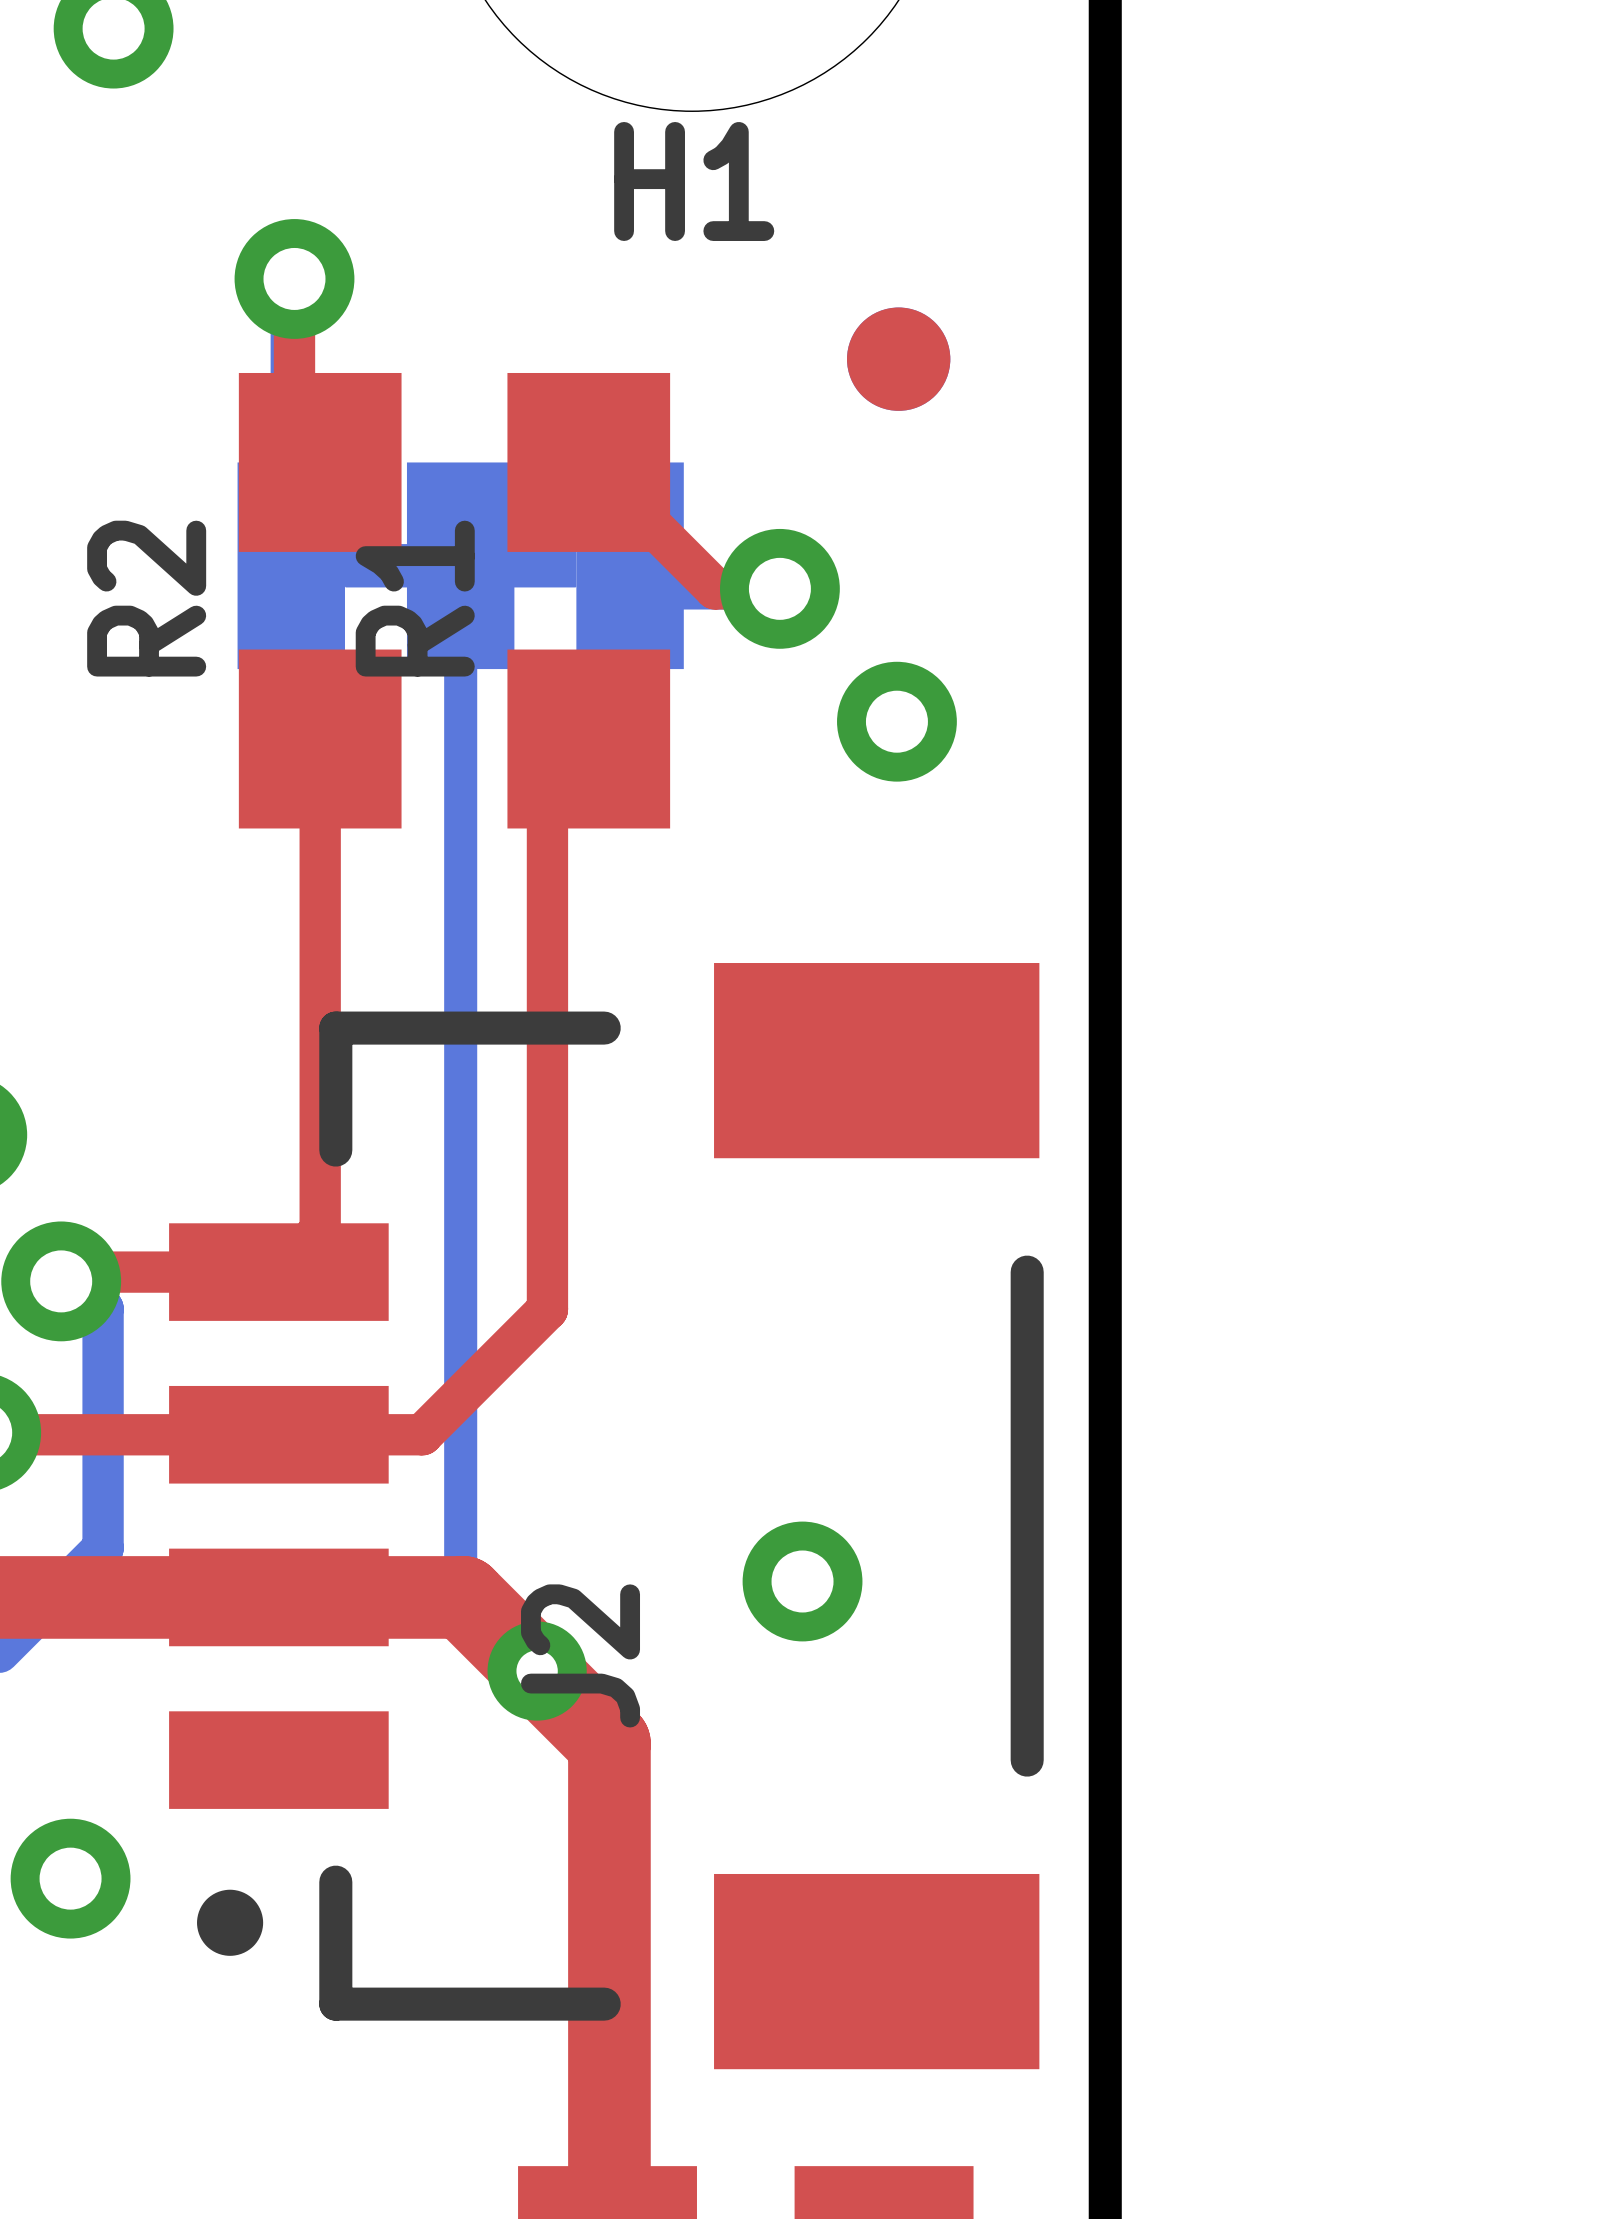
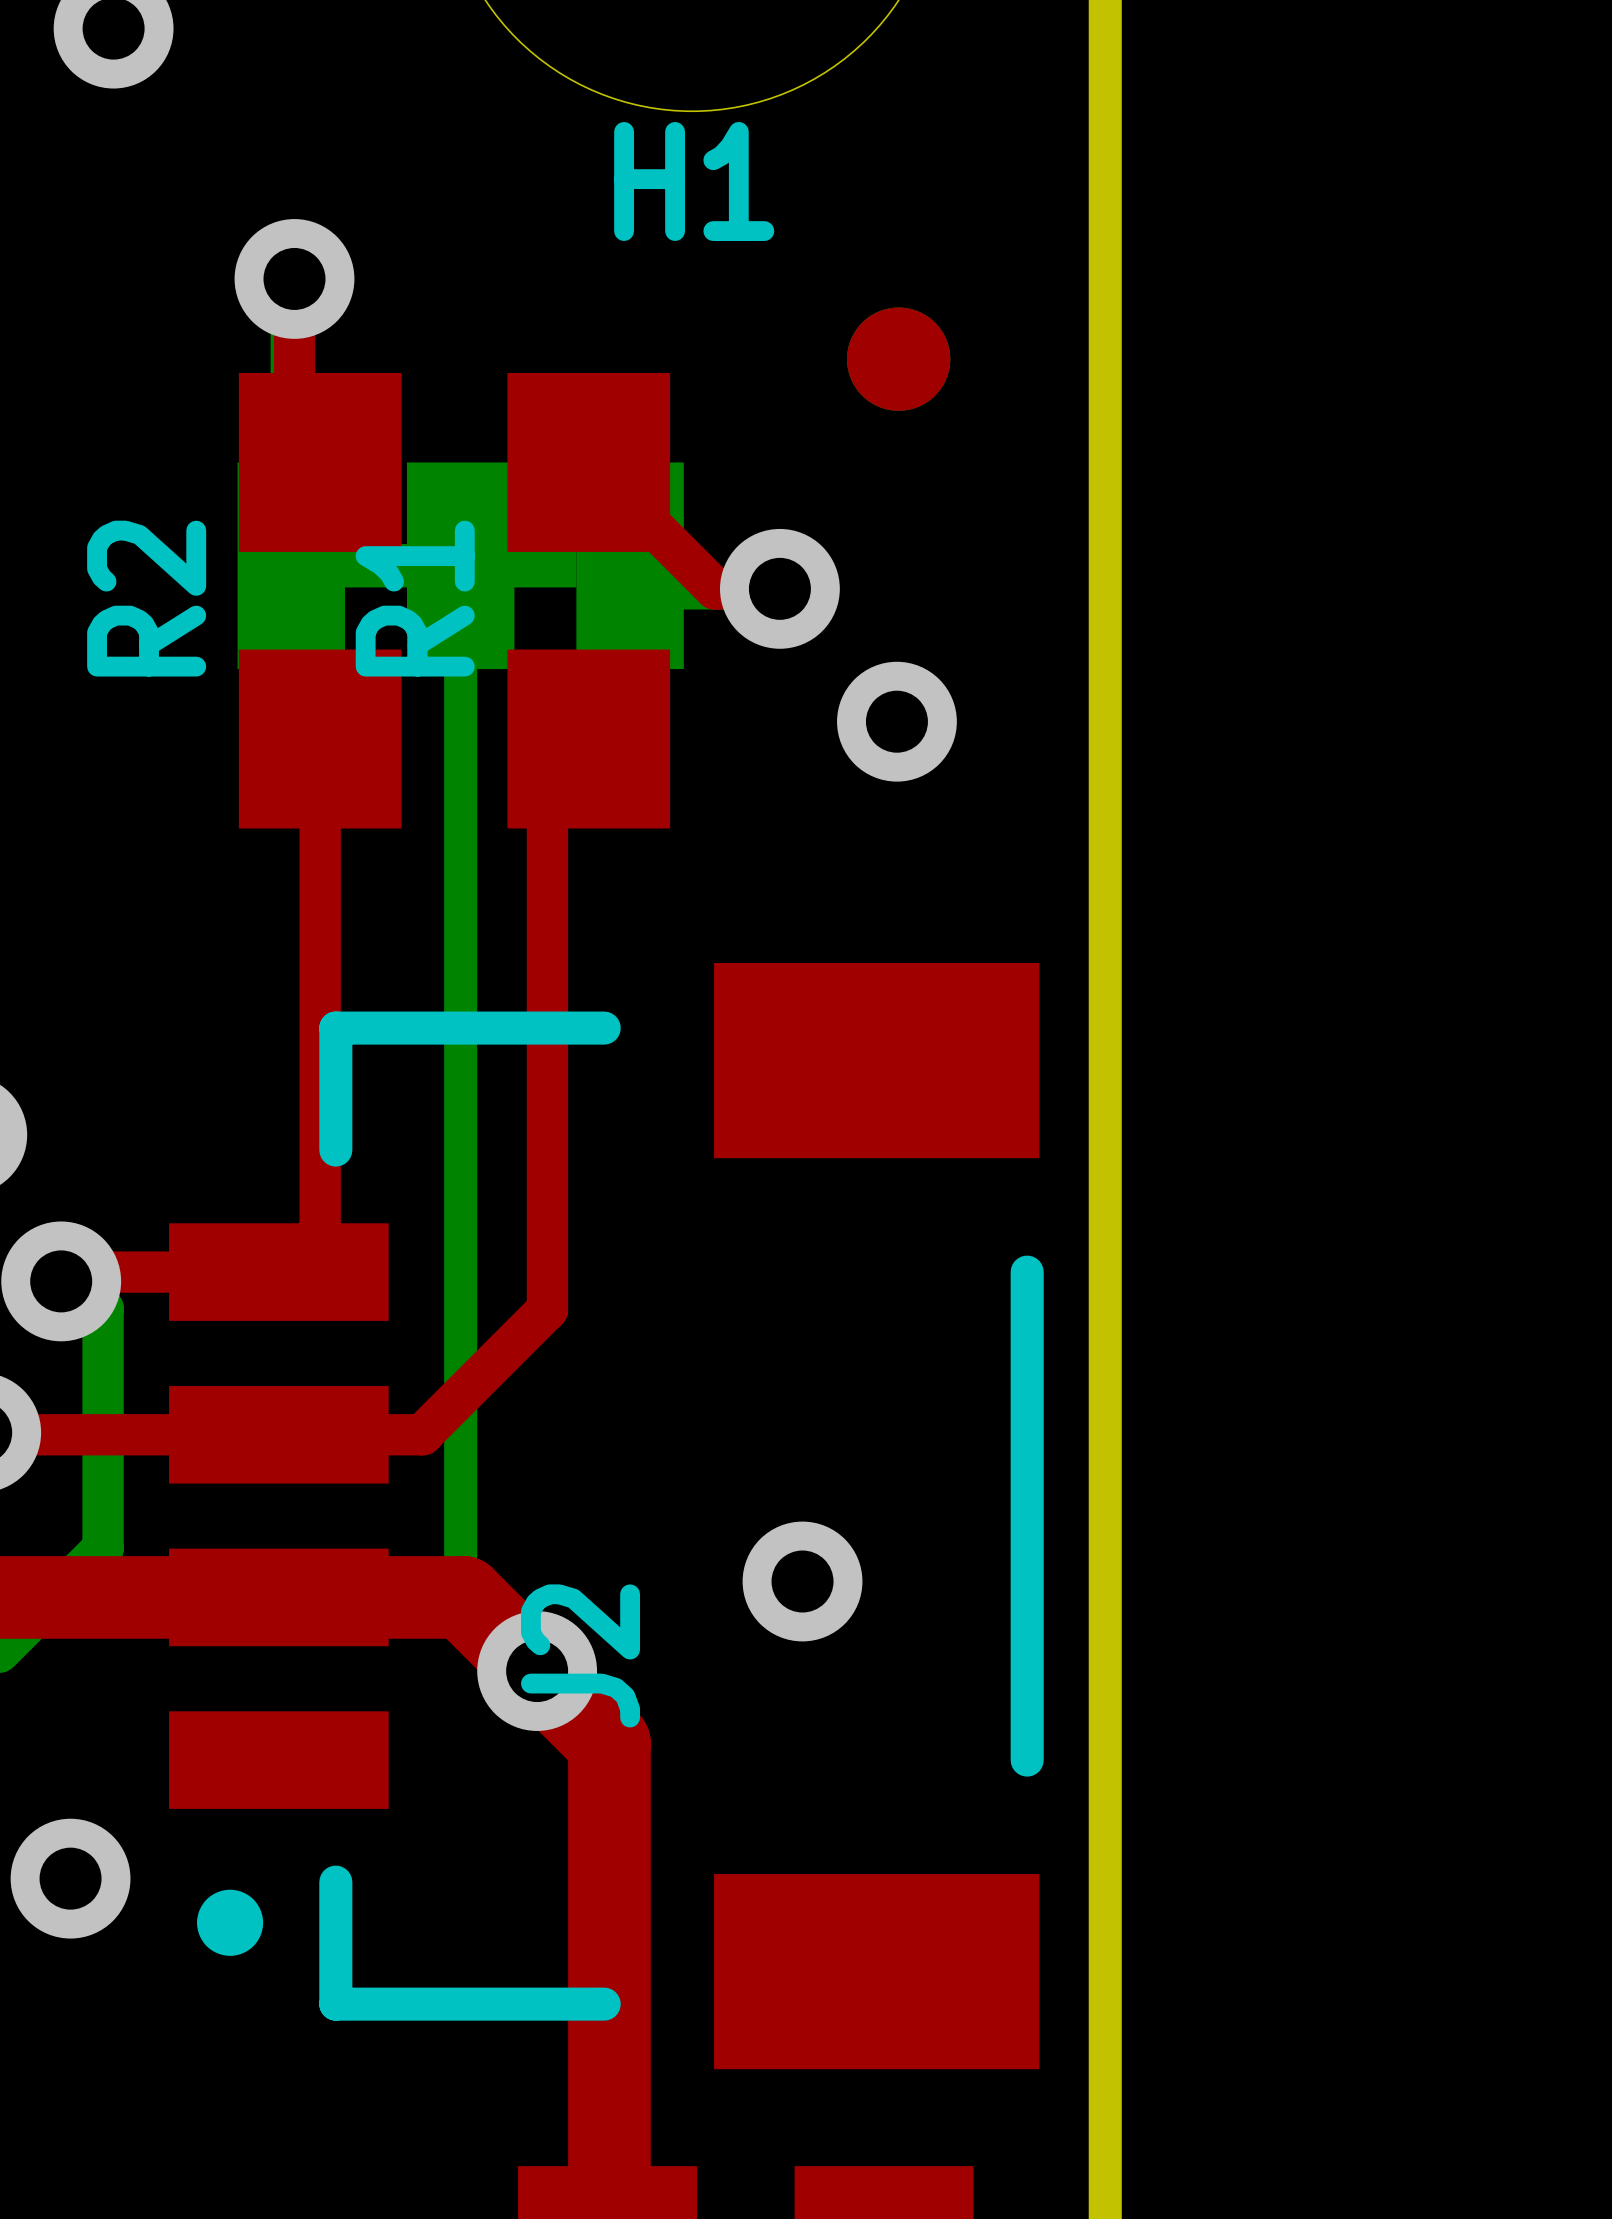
via size: [487, 1621, 587, 1721] -> [477, 1611, 598, 1731]

